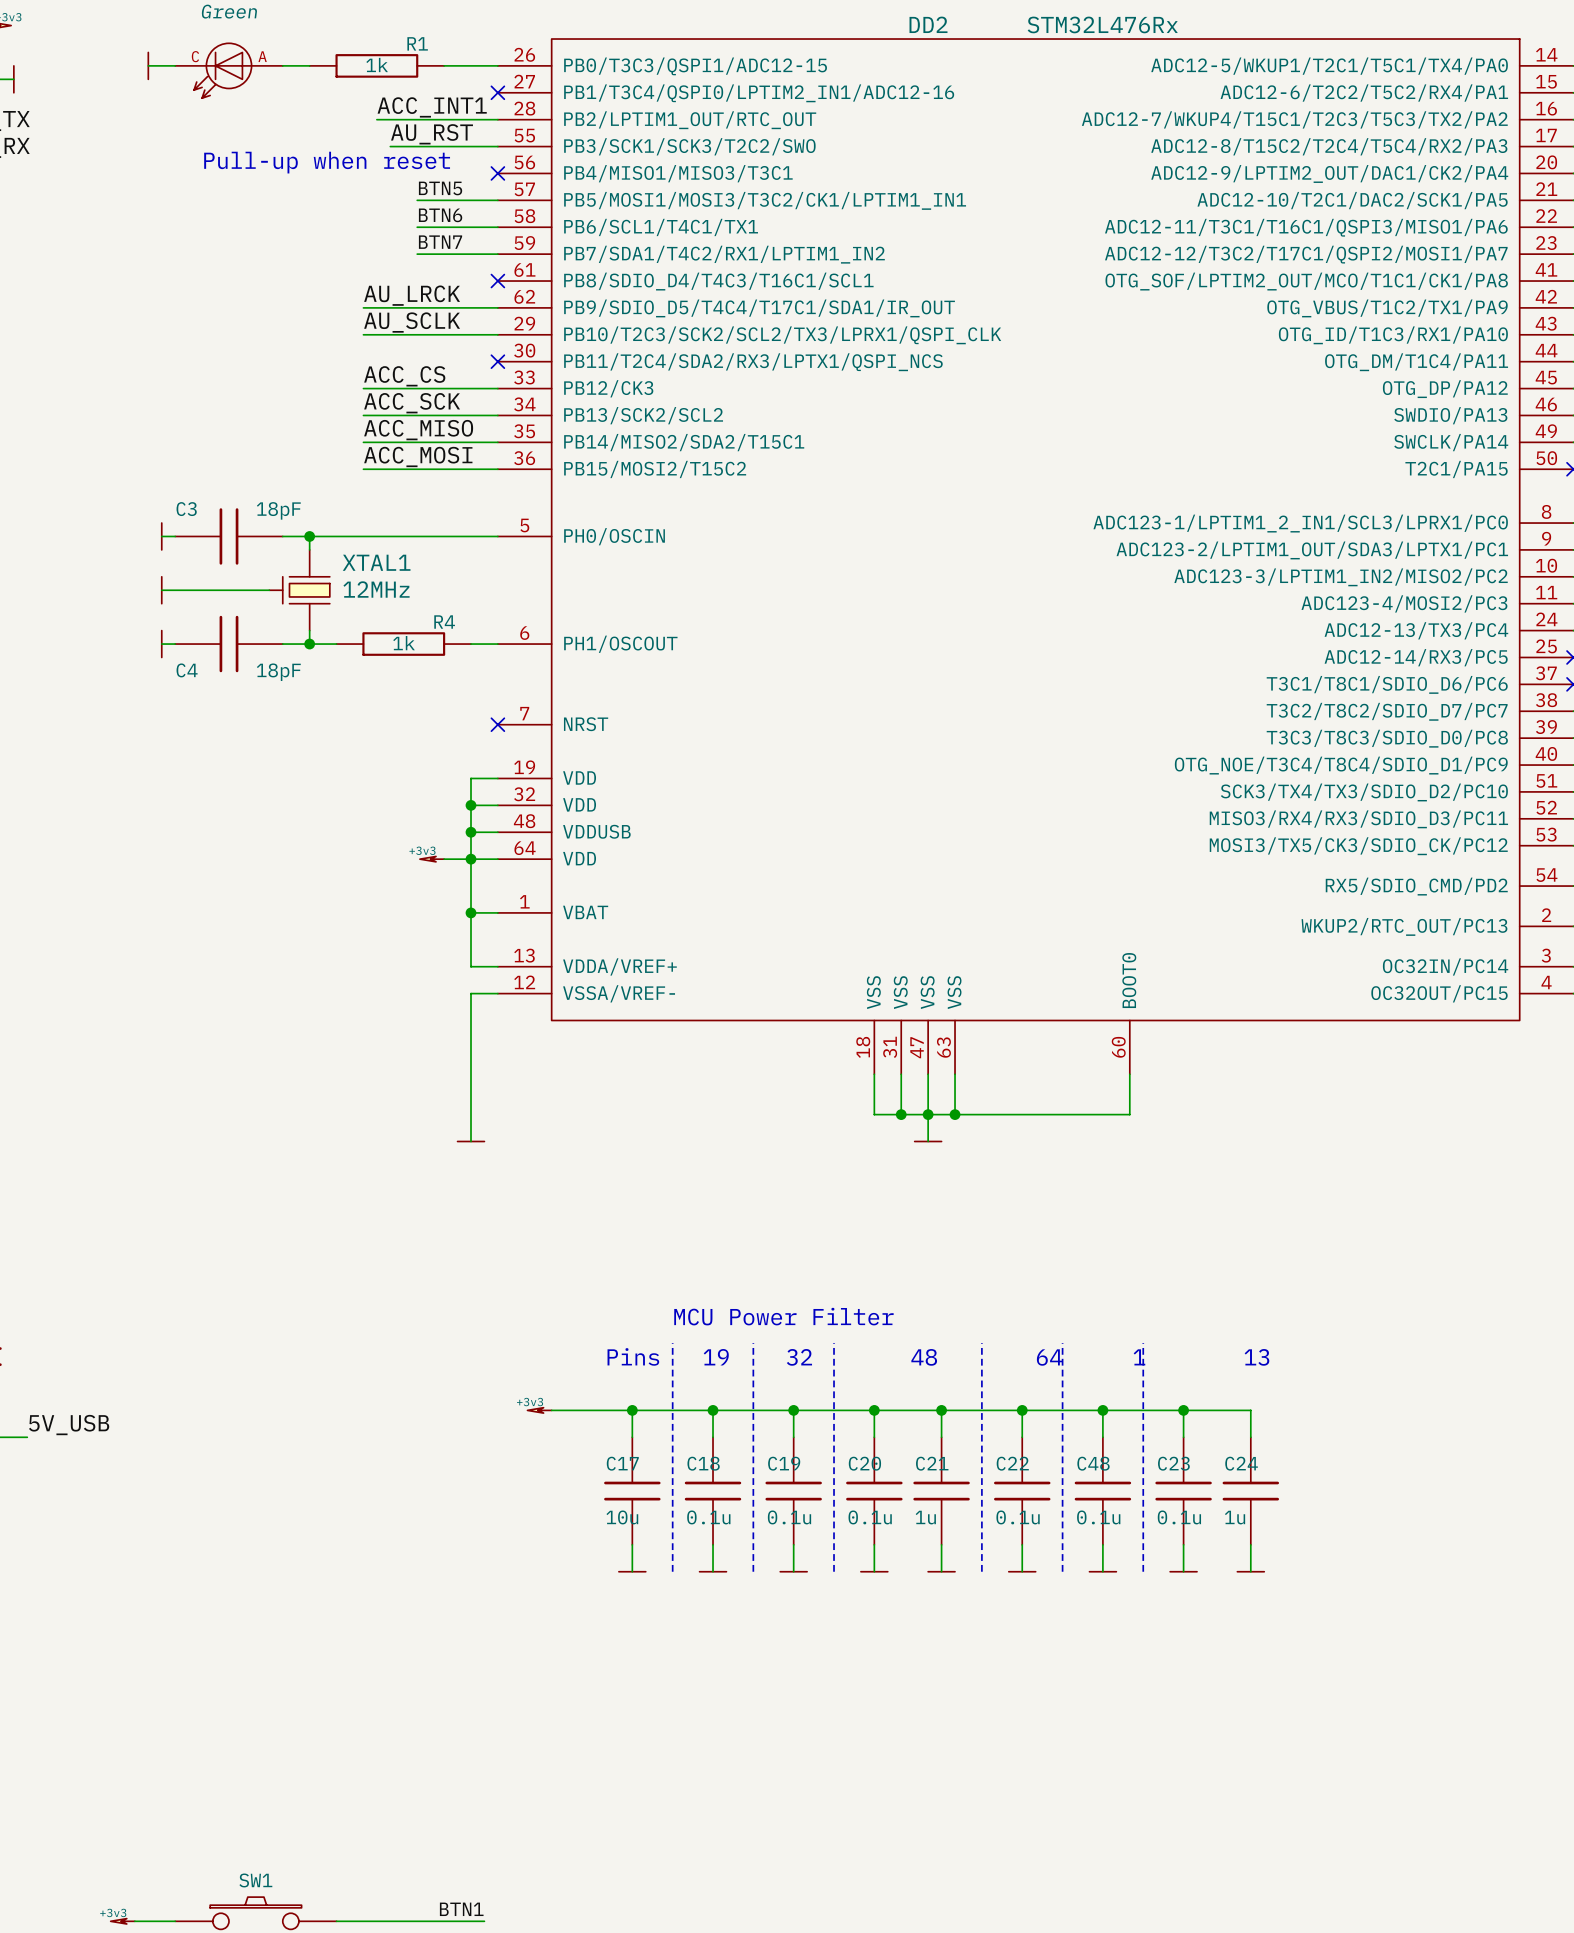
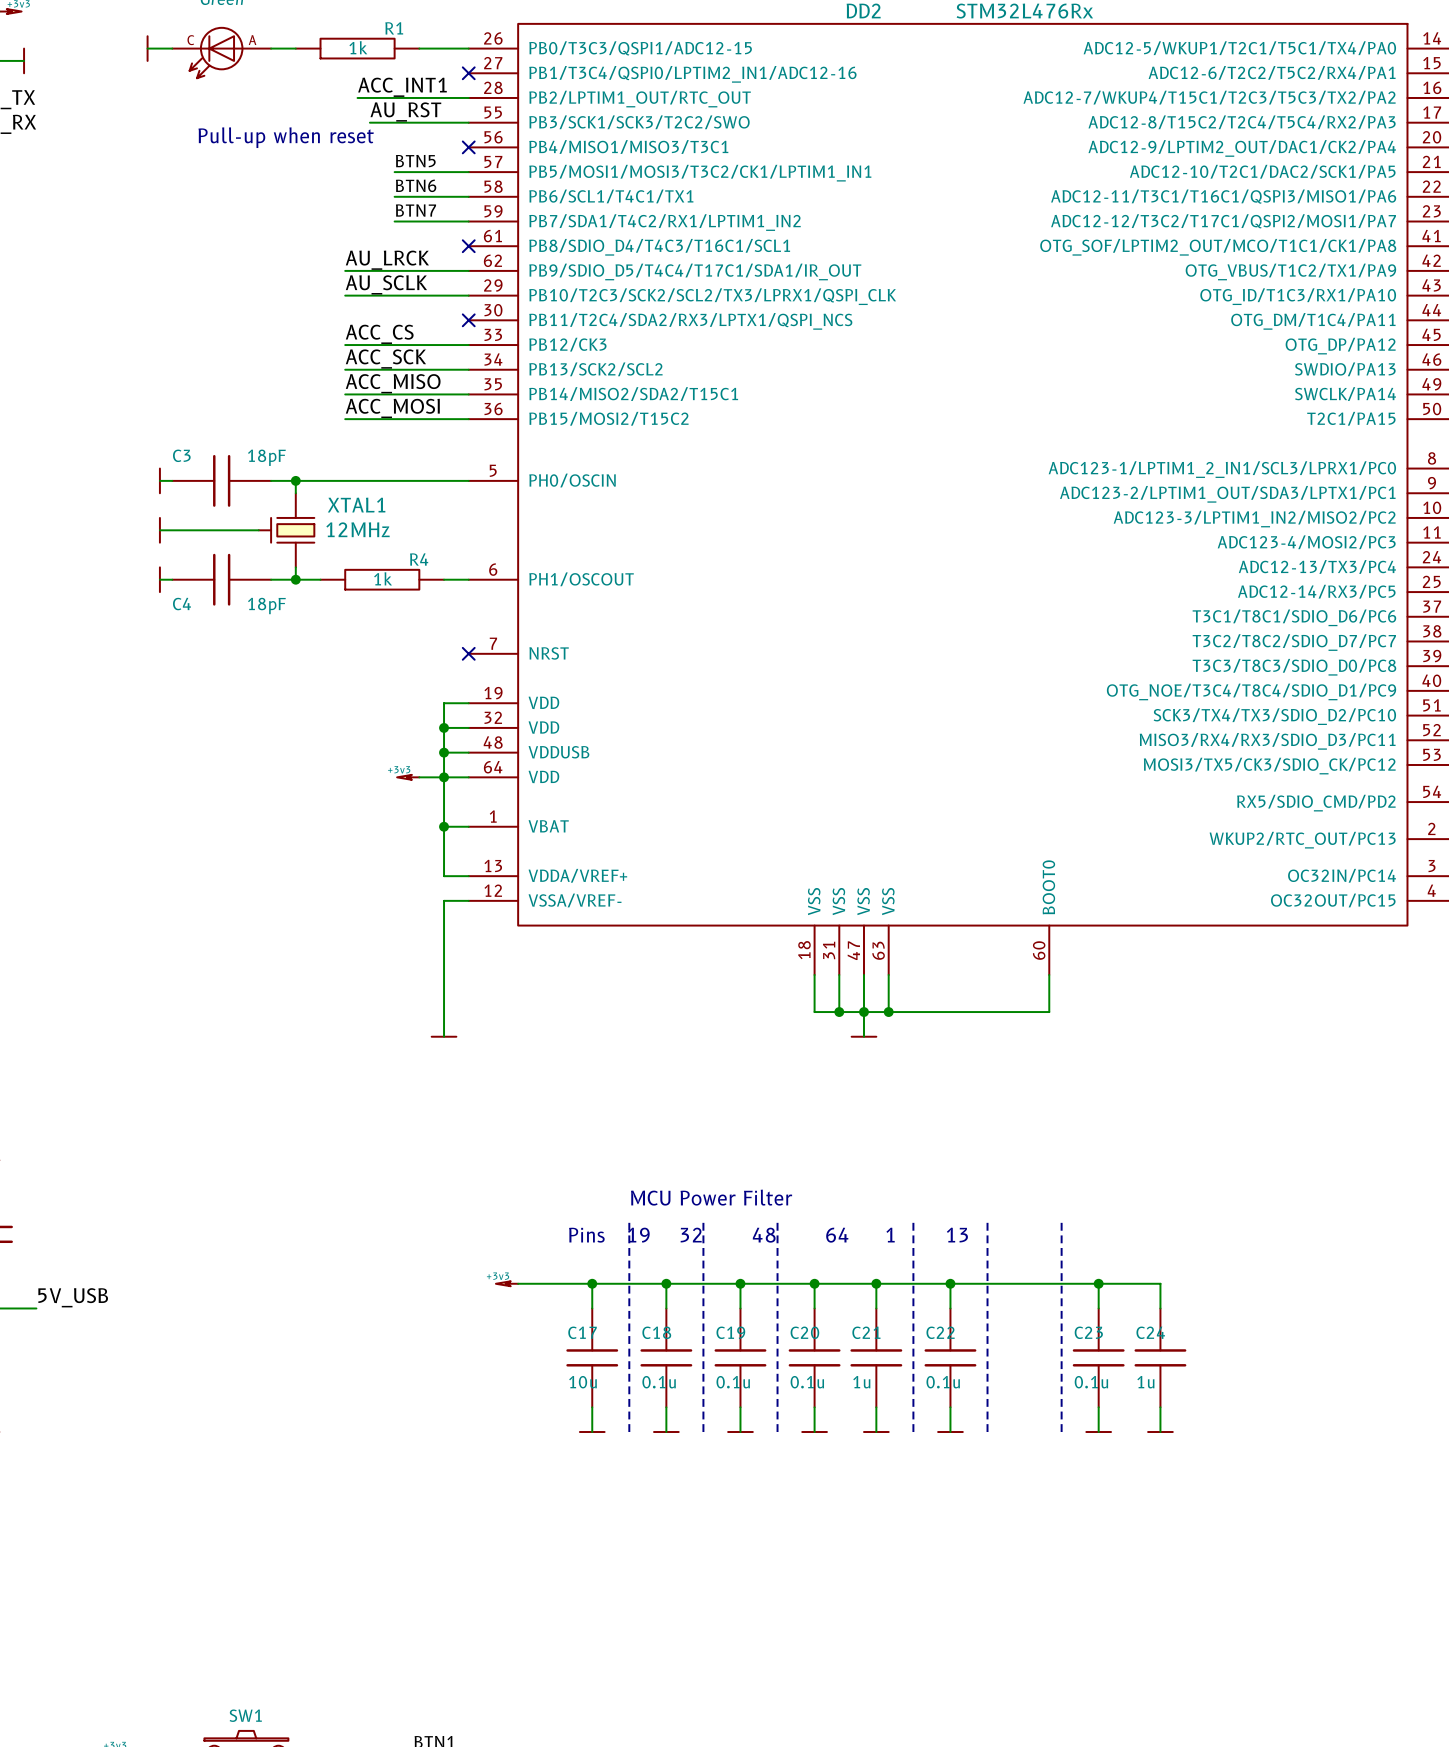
wire: (1102, 1410) (1102, 1437) -> none
junction: (1102, 1410) -> none
C48: 0.1u (1102, 1491) -> none
wire: (1102, 1544) (1102, 1571) -> none
power symbol: (1102, 1571) -> none

